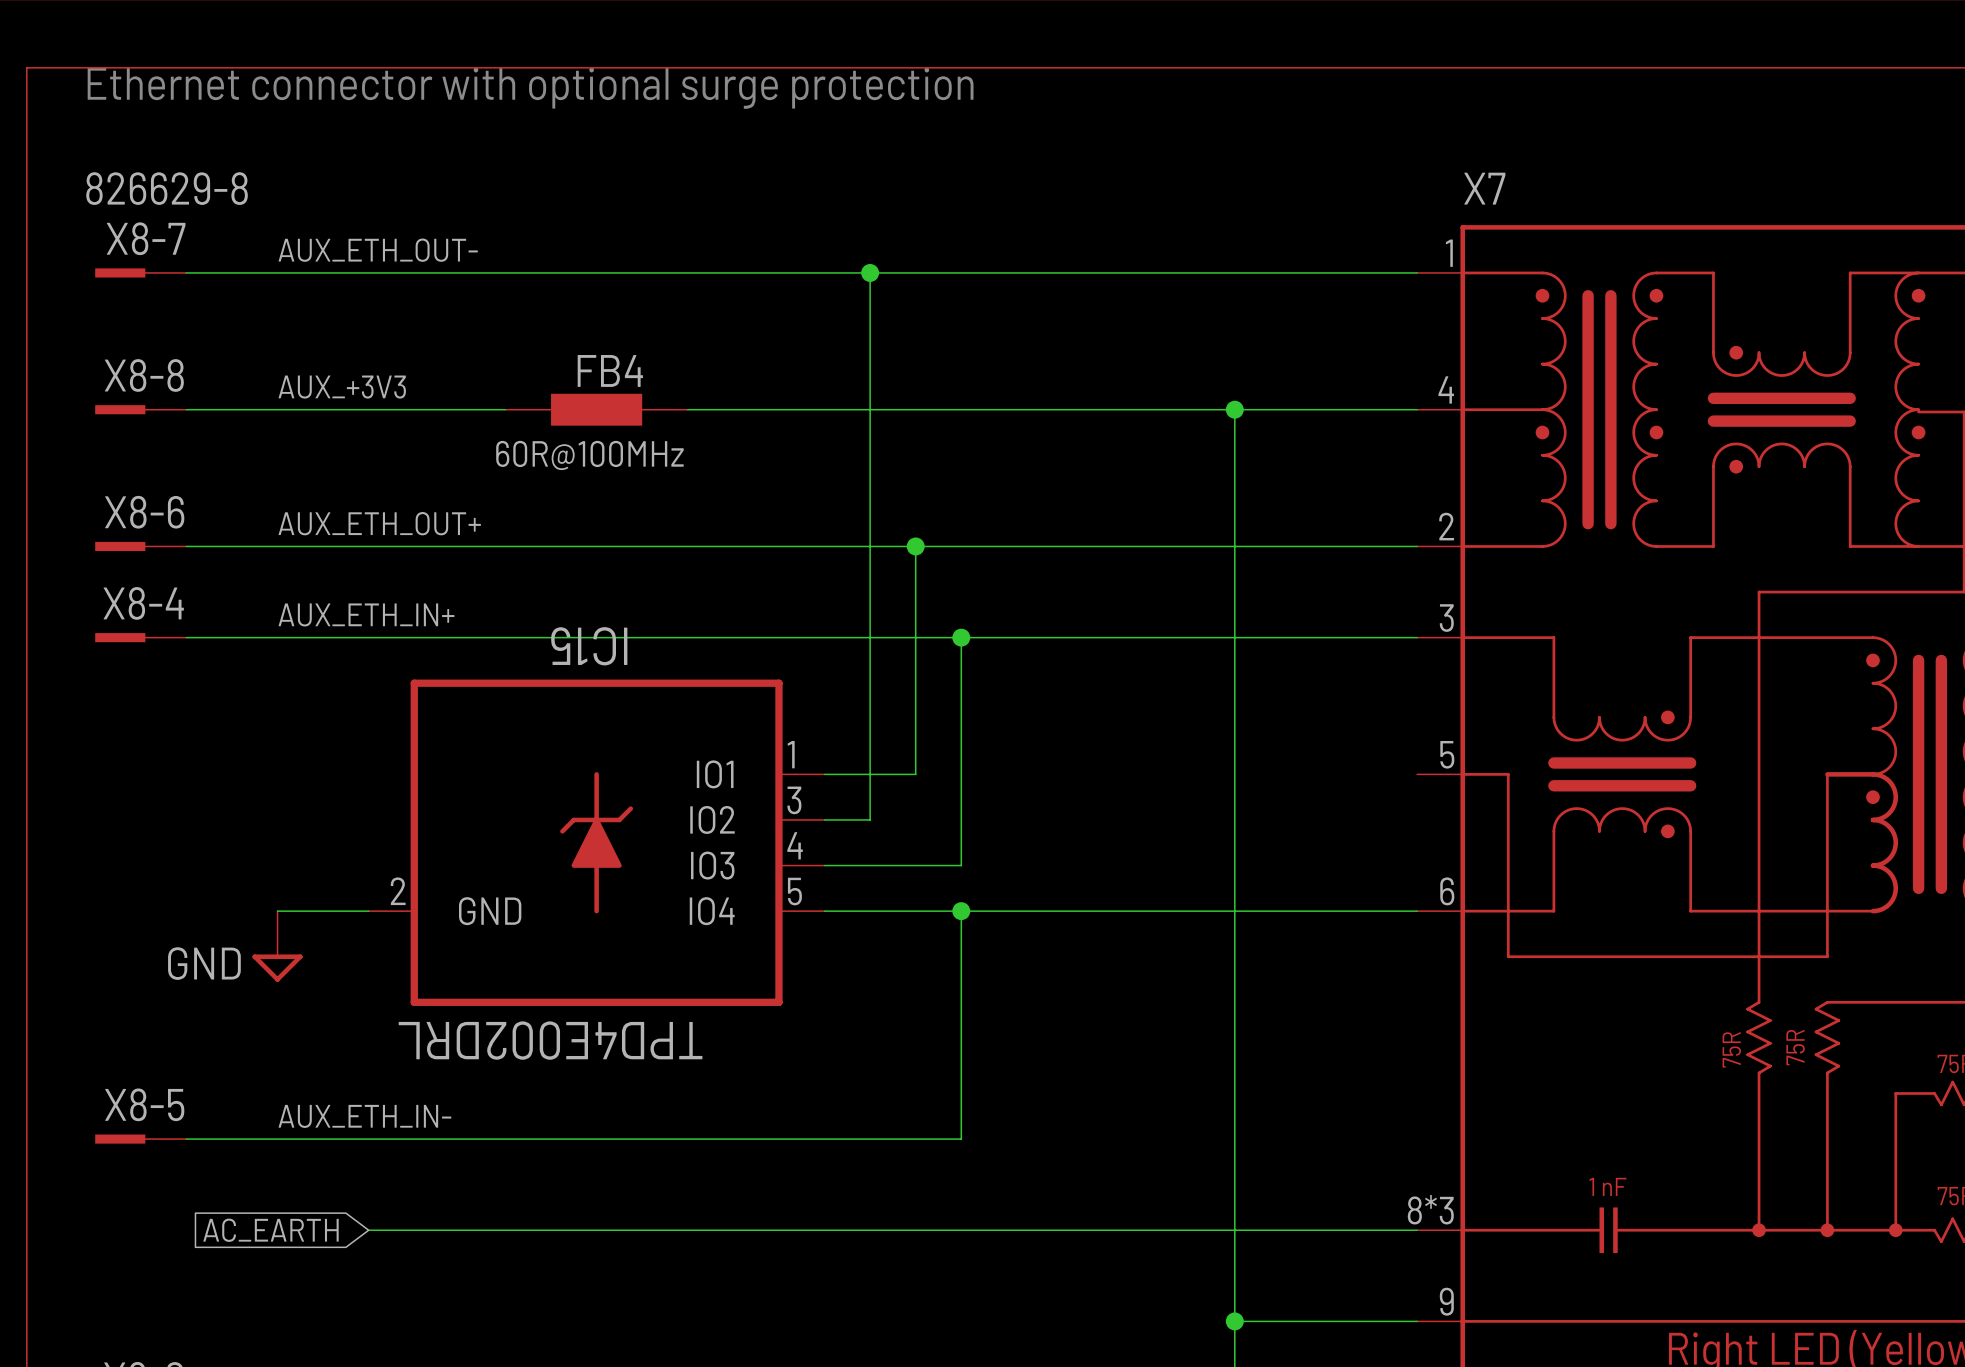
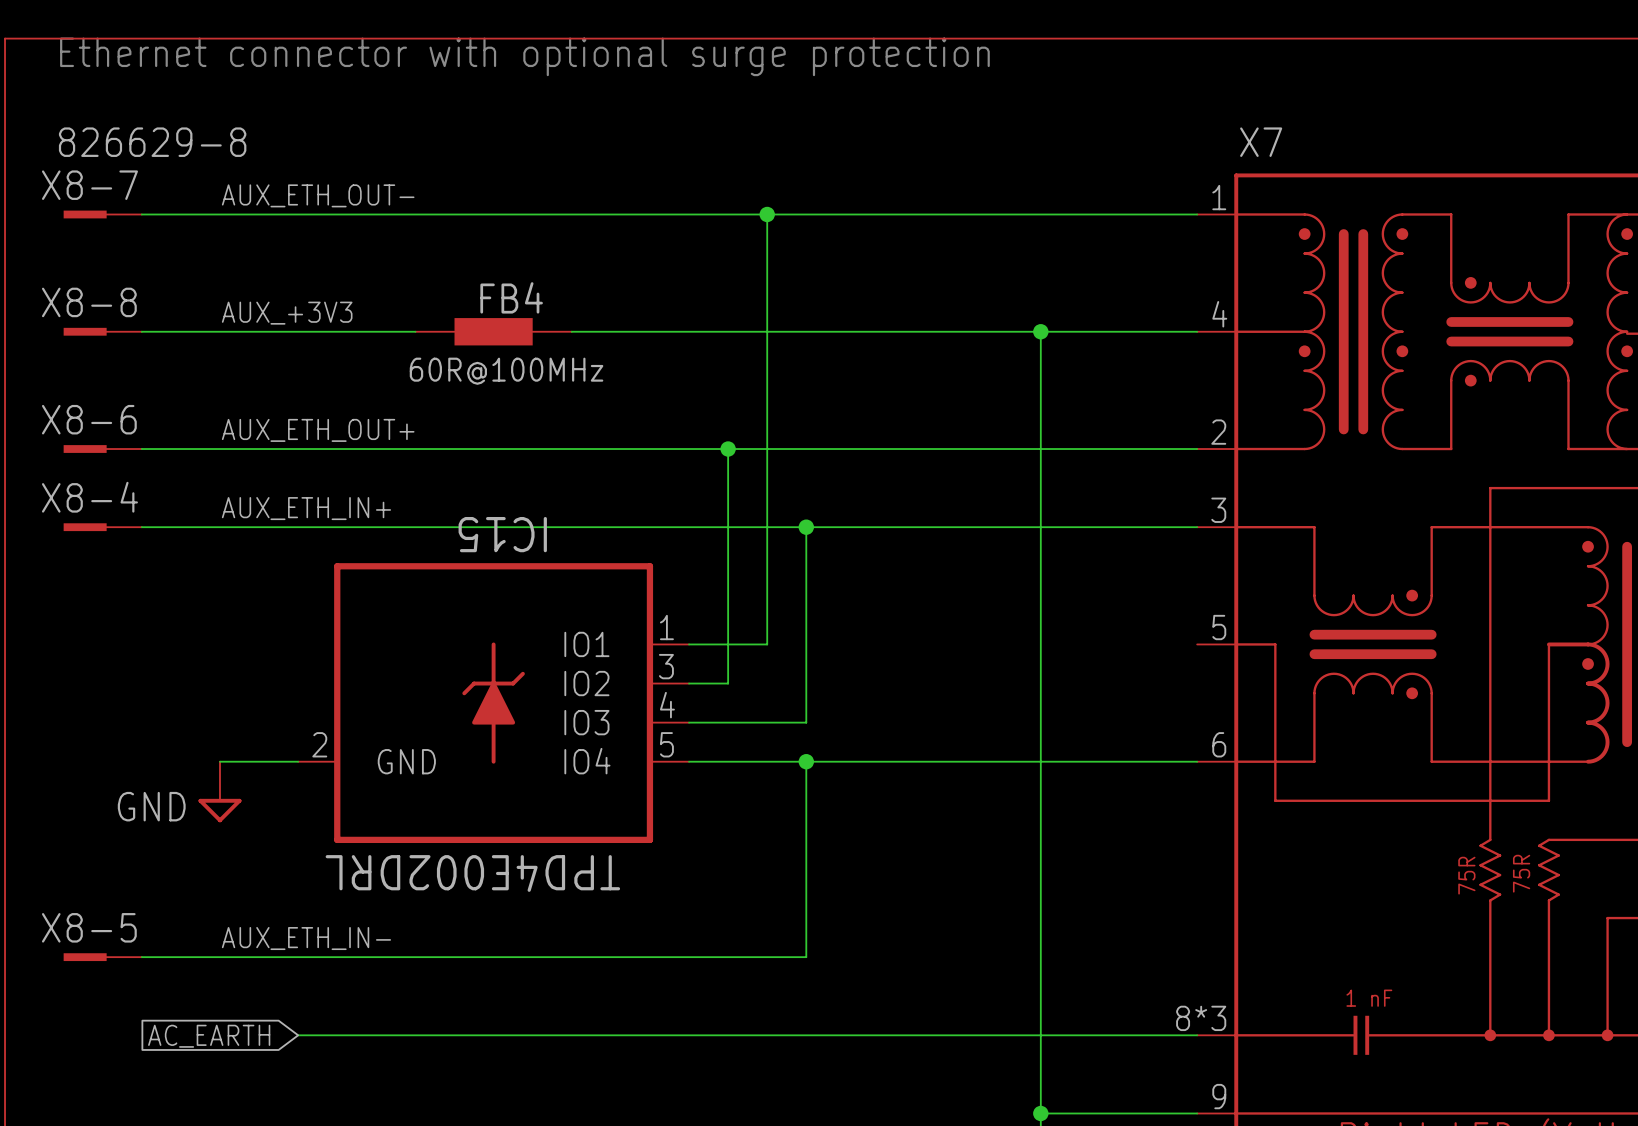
wire: (870, 272) (870, 546) -> (767, 214) (767, 449)
junction position: (870, 272) -> (767, 214)
junction position: (915, 546) -> (728, 449)

